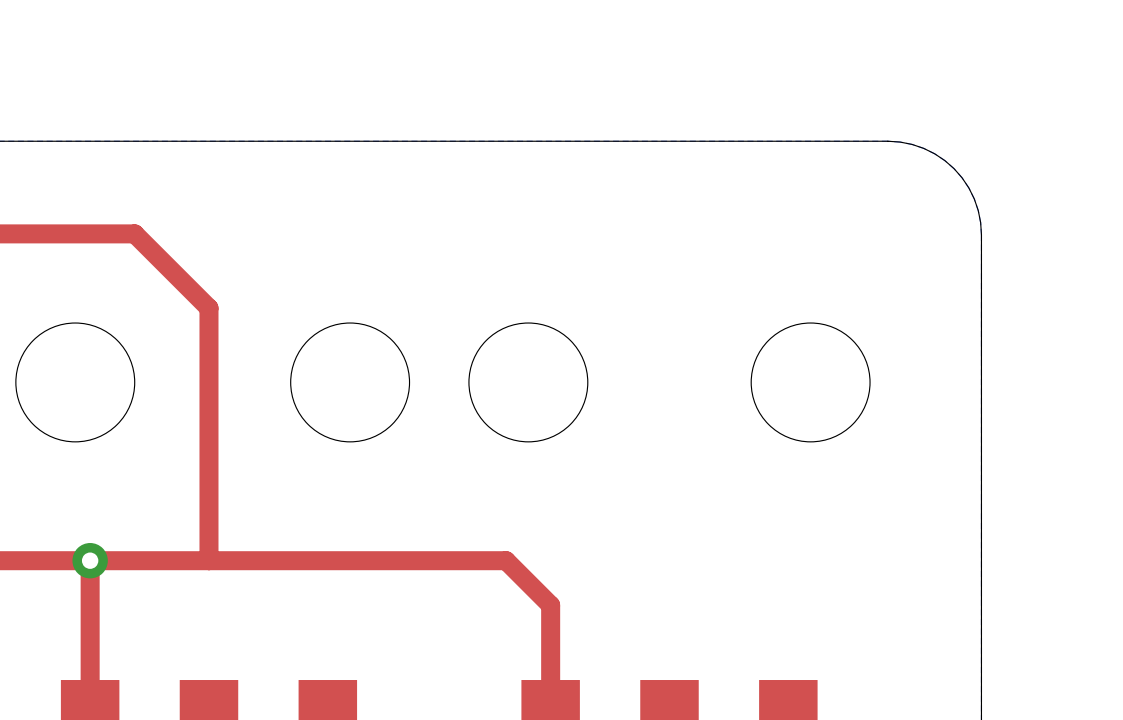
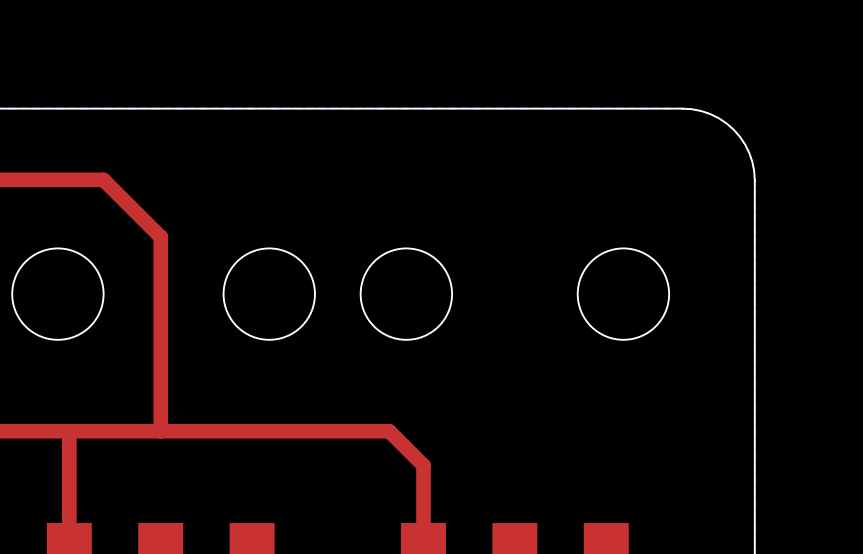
via: (90, 560) -> none

